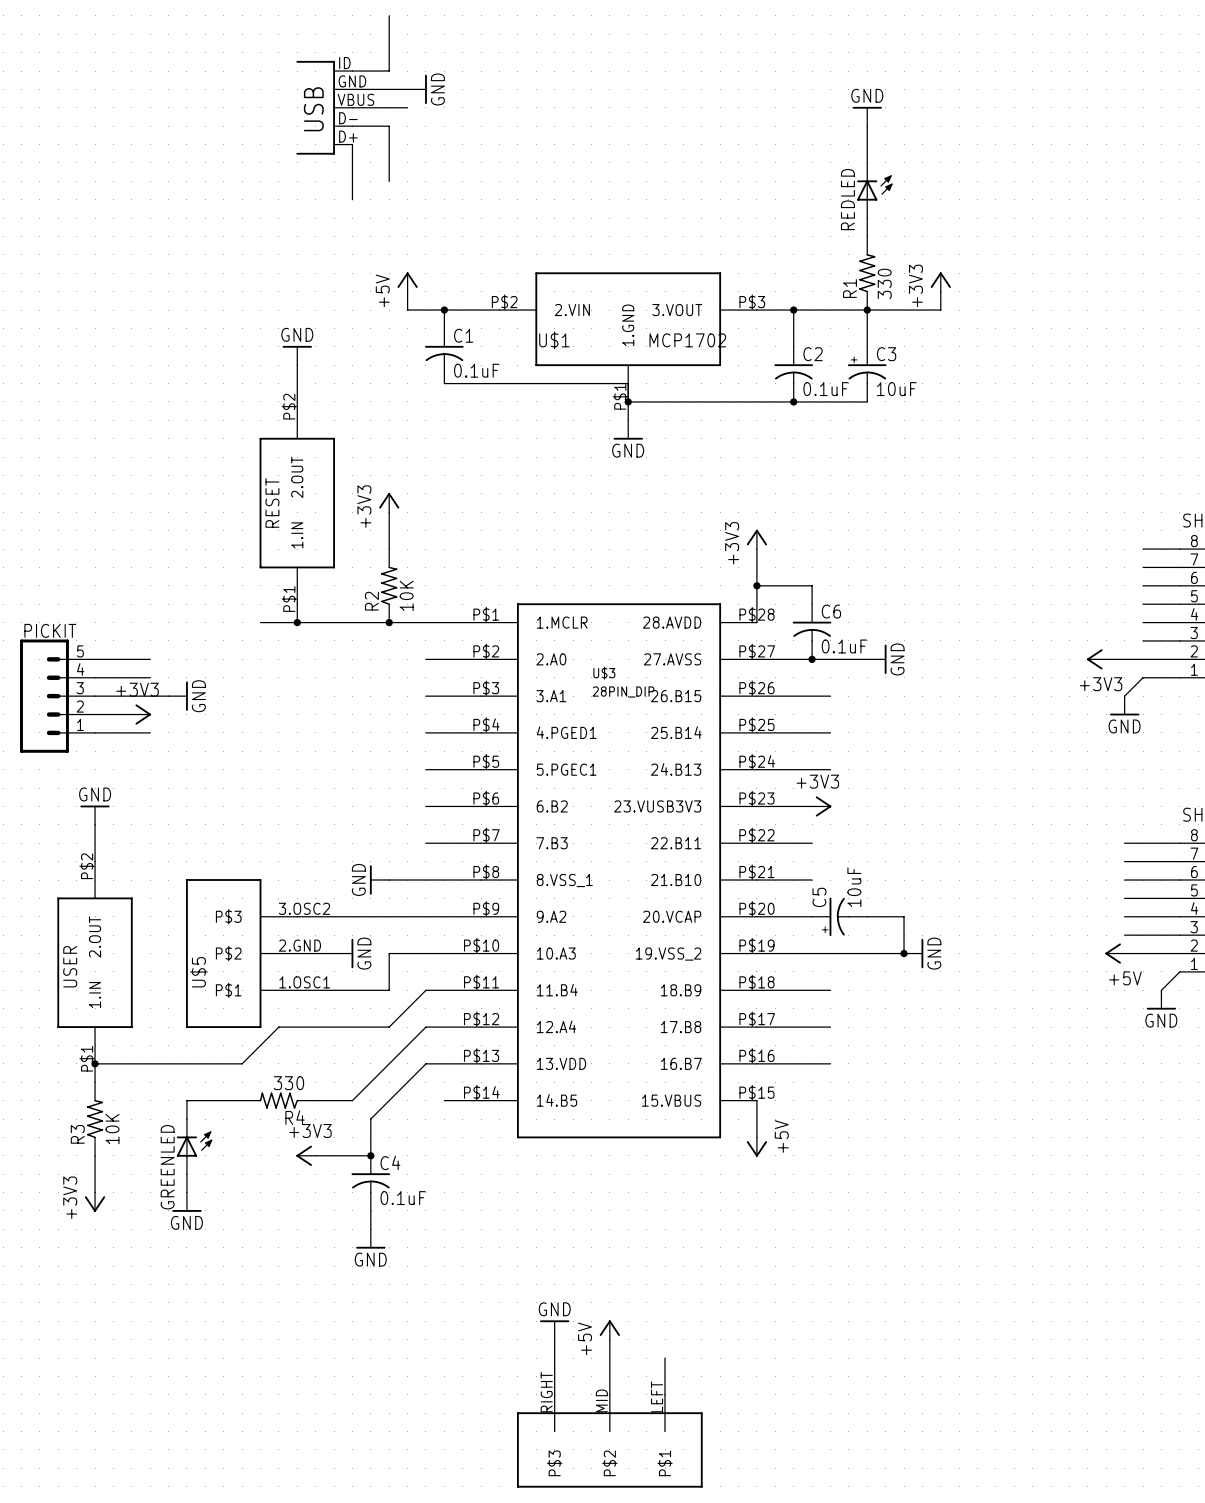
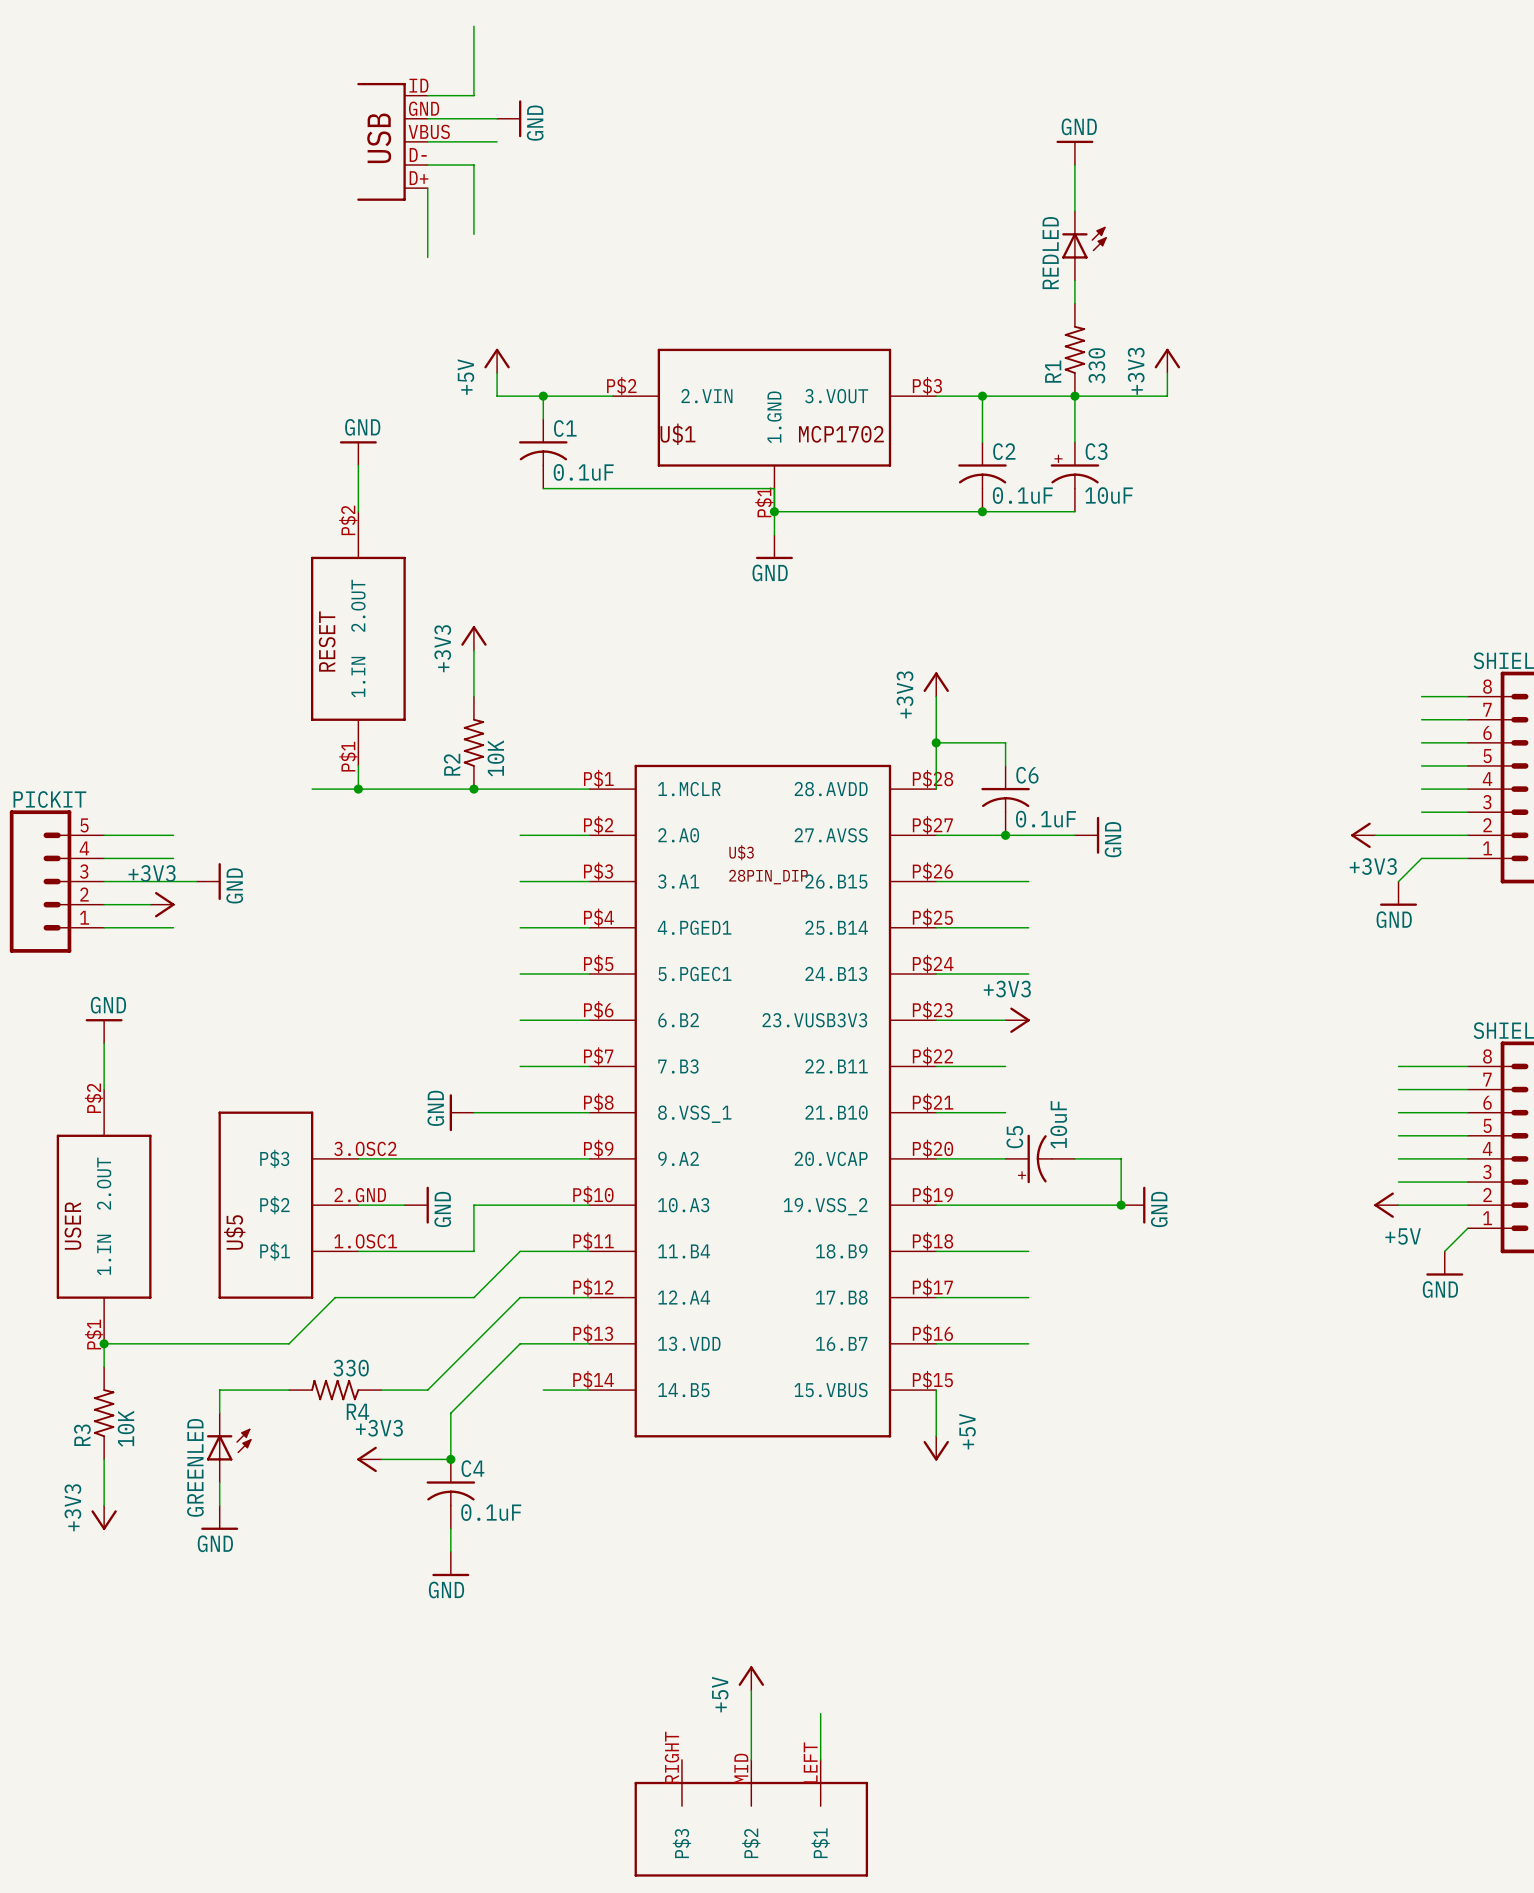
power symbol: GND (554, 1330) -> none
wire: (554, 1339) (554, 1394) -> none

